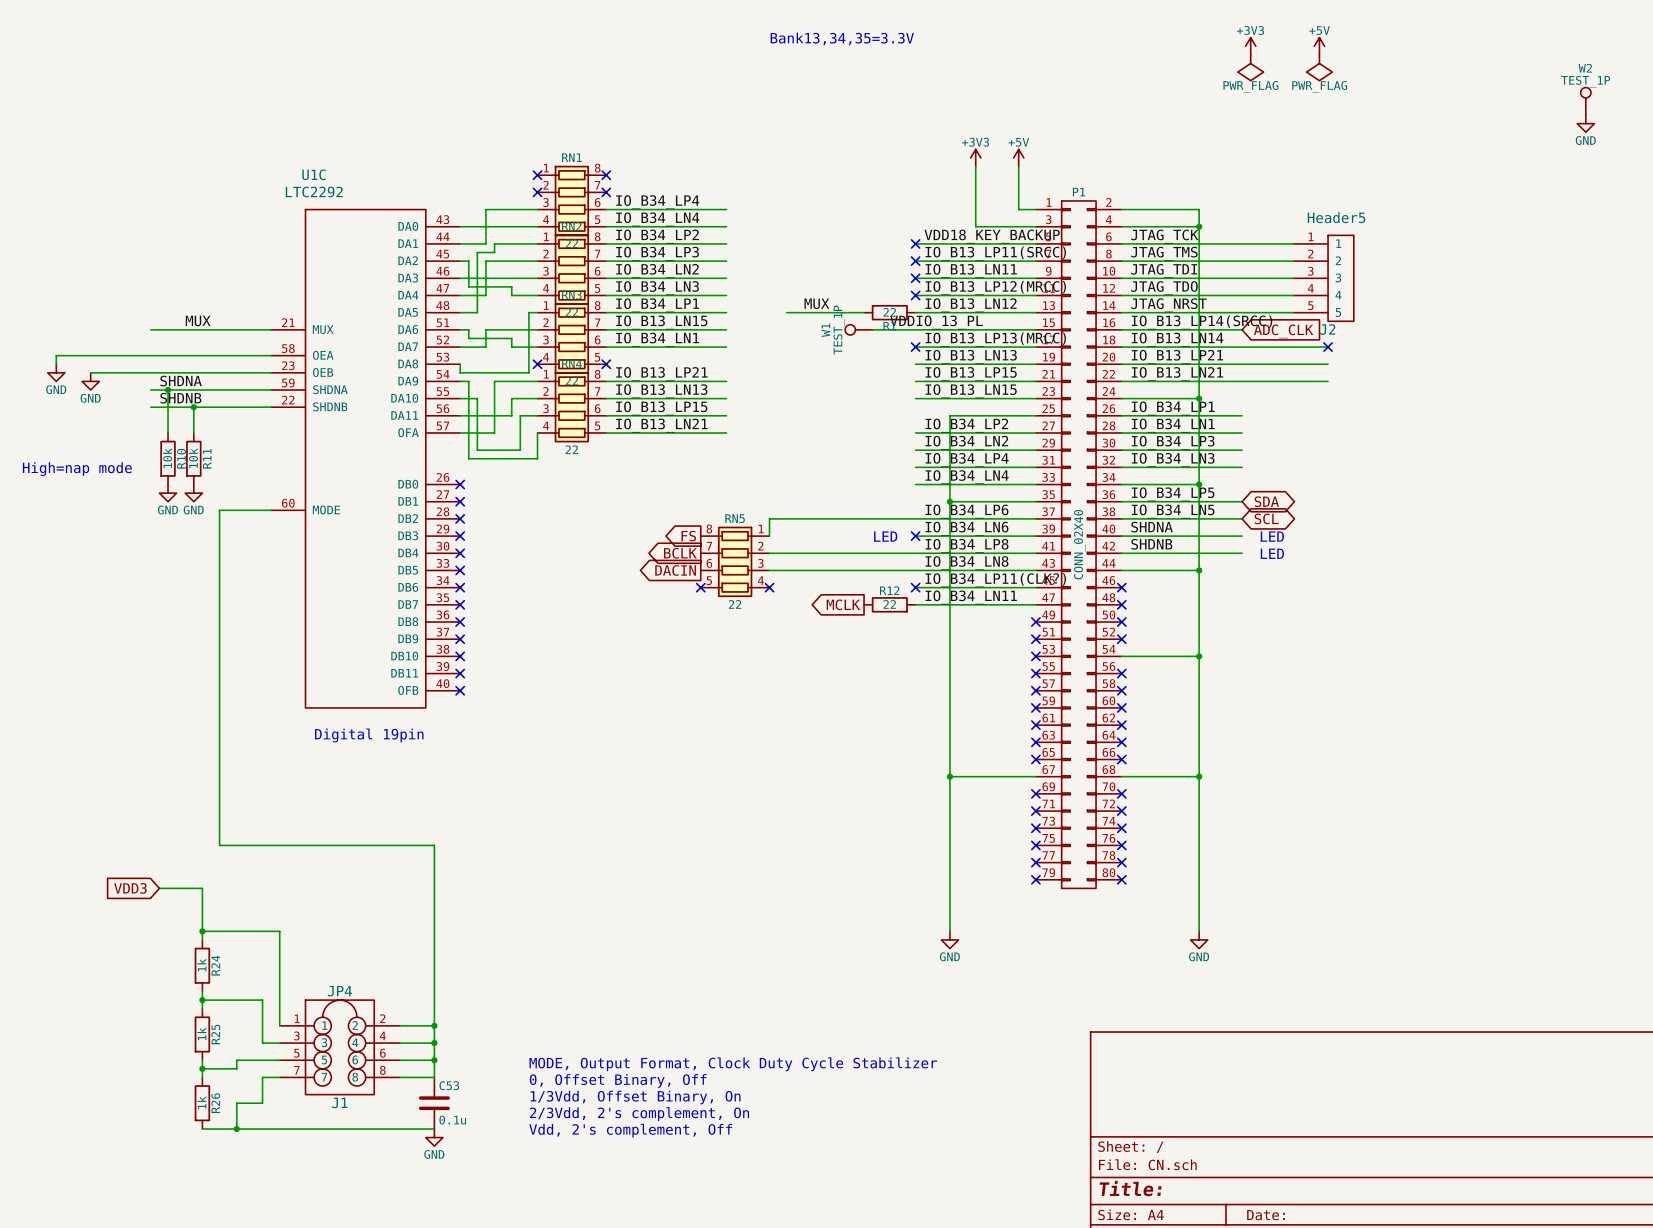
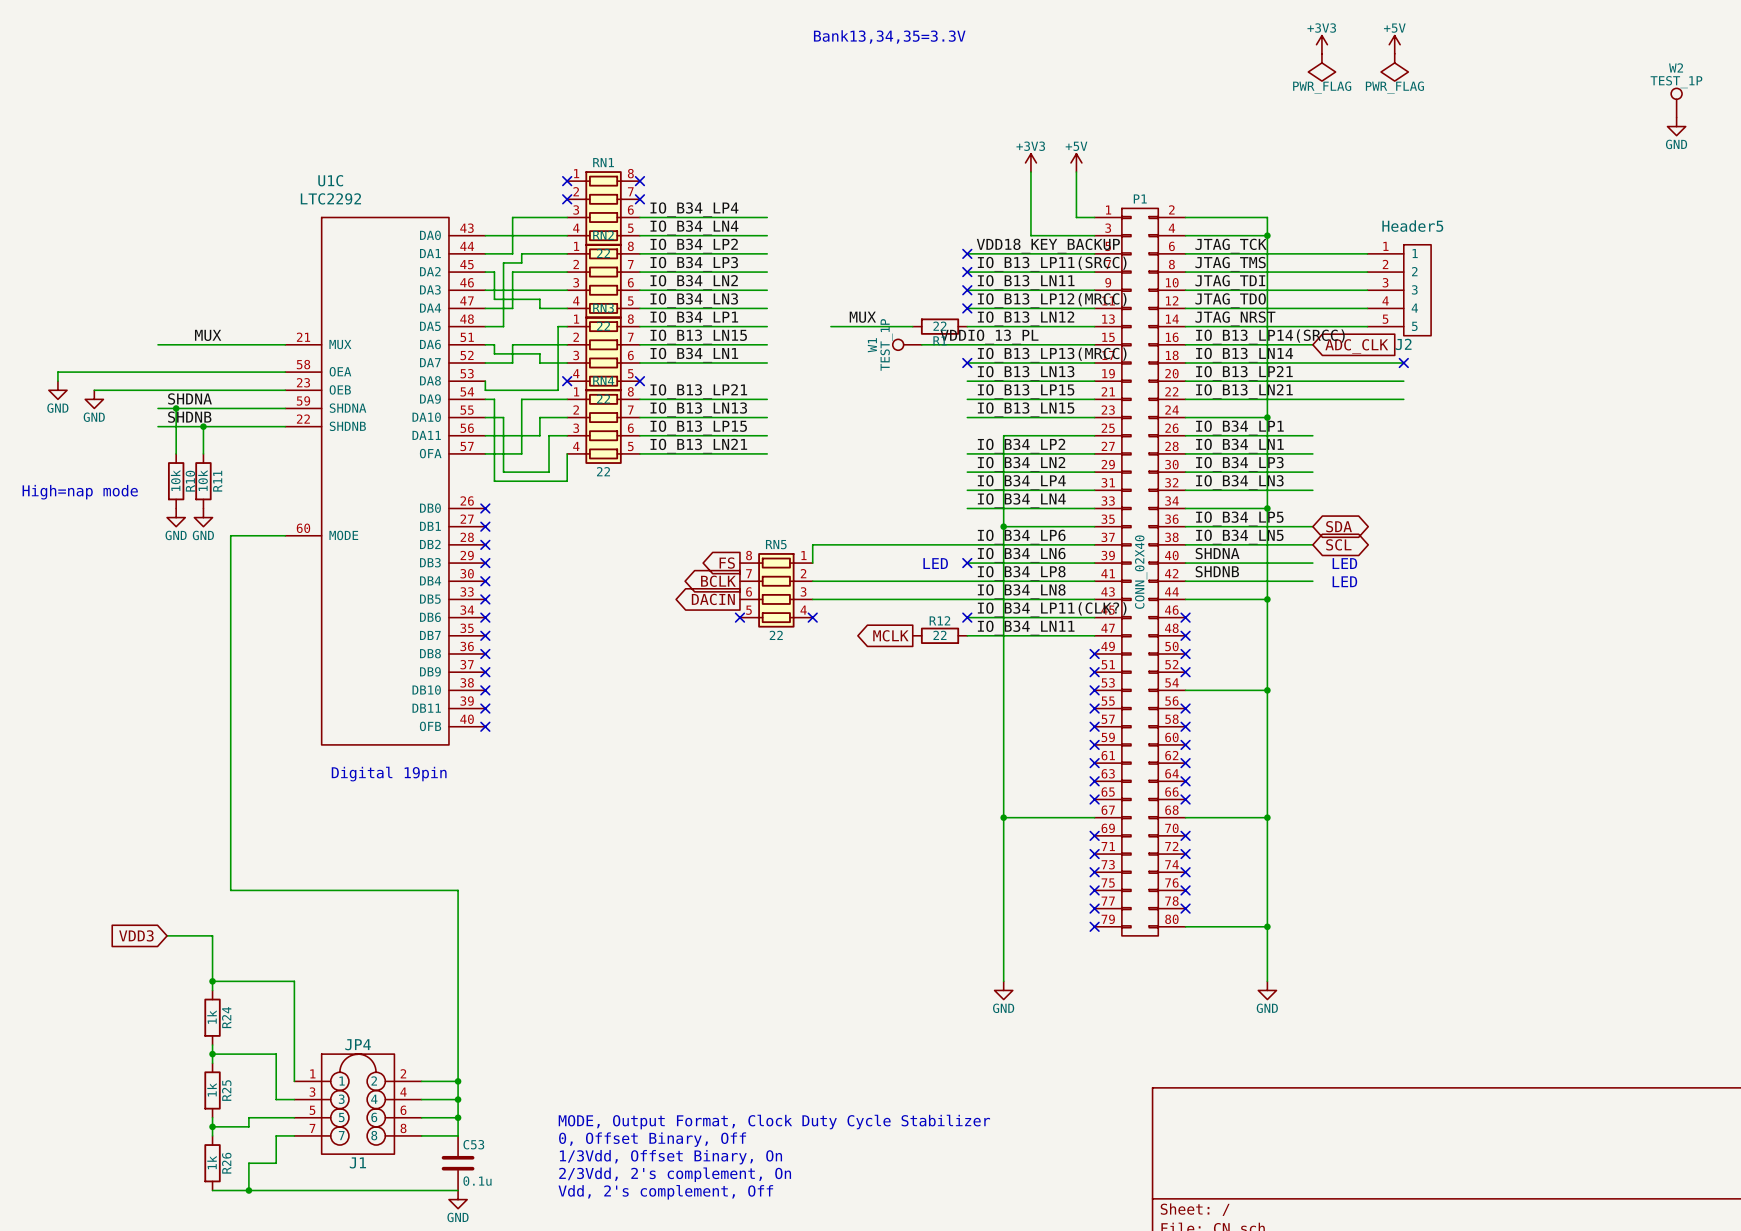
wire: none -> (1185, 926) (1267, 926)
no-connect mark: (1121, 879) -> none
junction: none -> (1267, 926)

